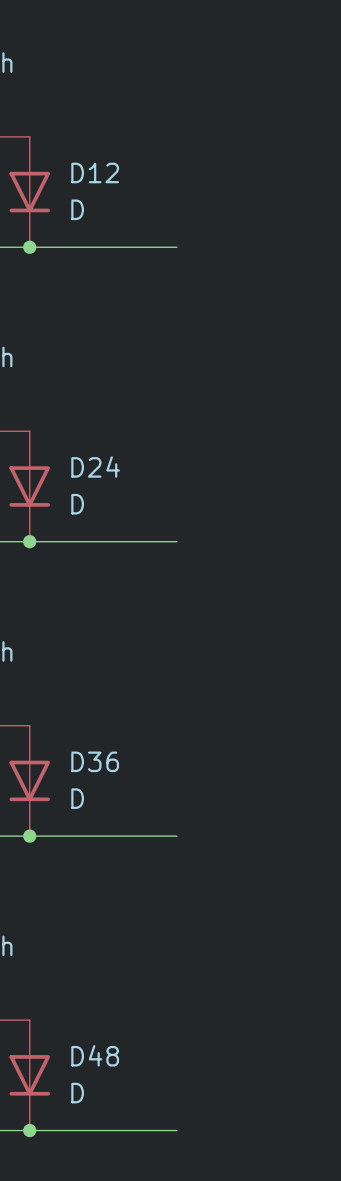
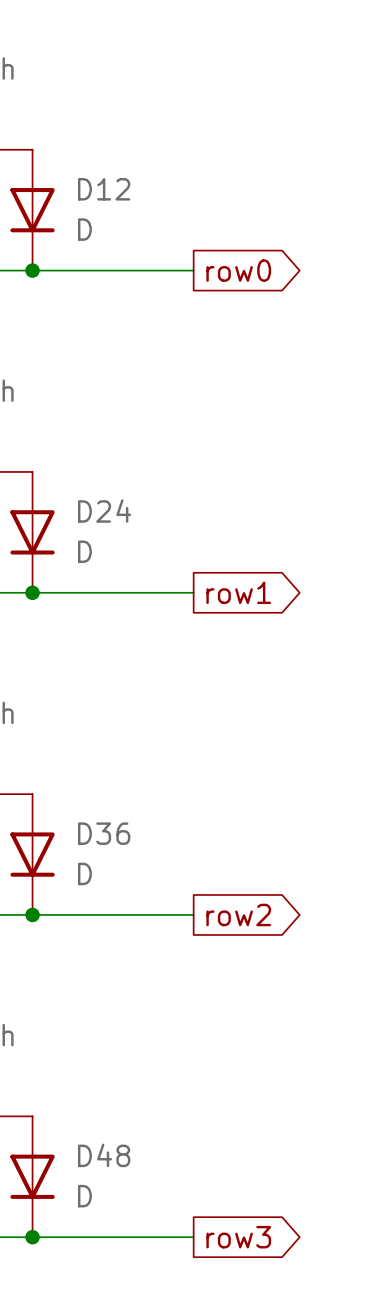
global label: none -> row0 (238, 270)
global label: none -> row1 (238, 592)
global label: none -> row2 (238, 914)
global label: none -> row3 (238, 1237)

